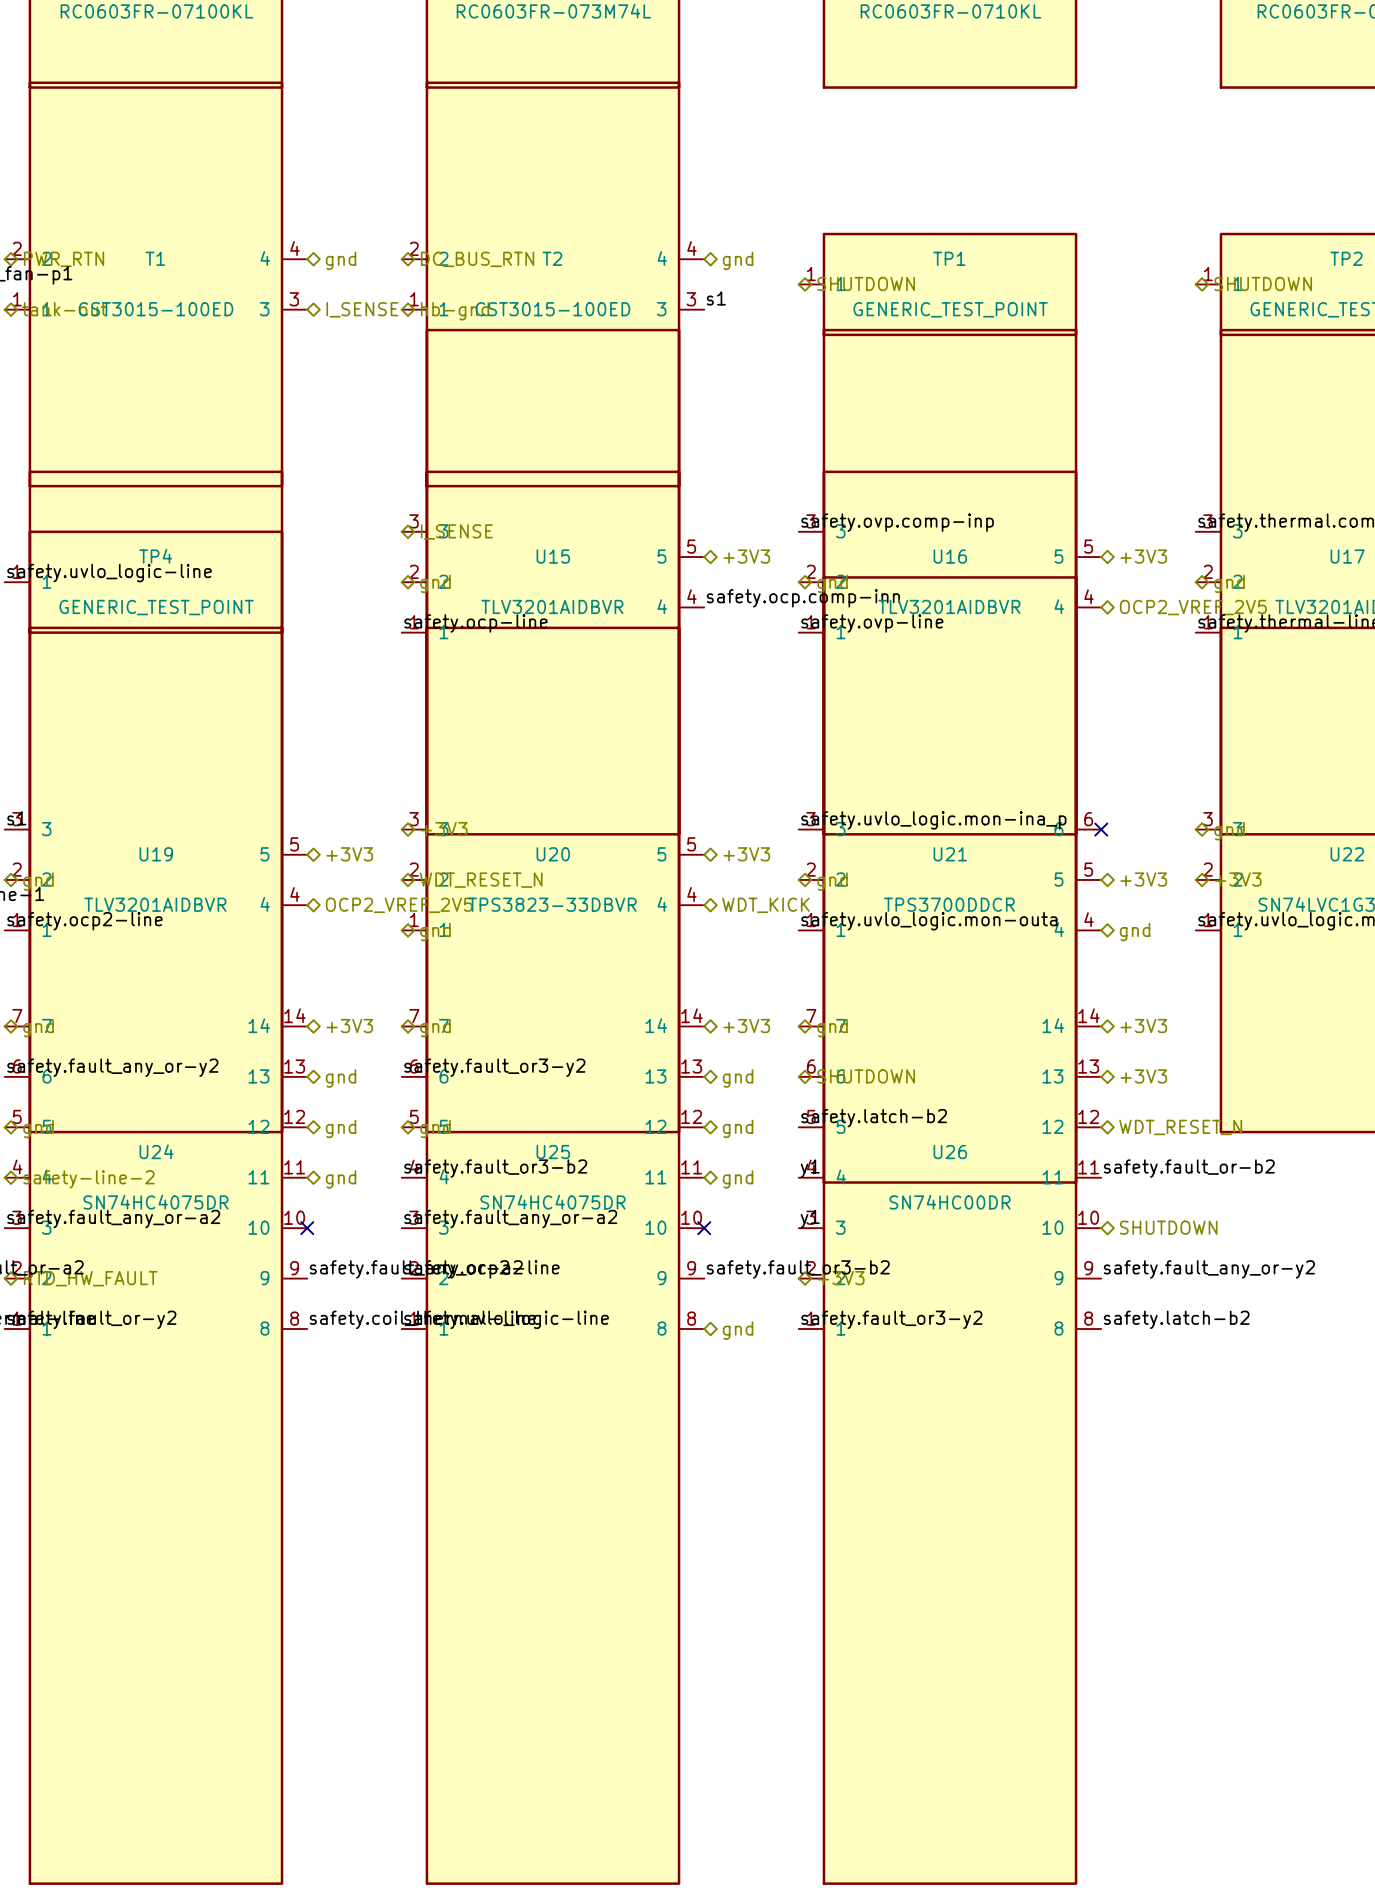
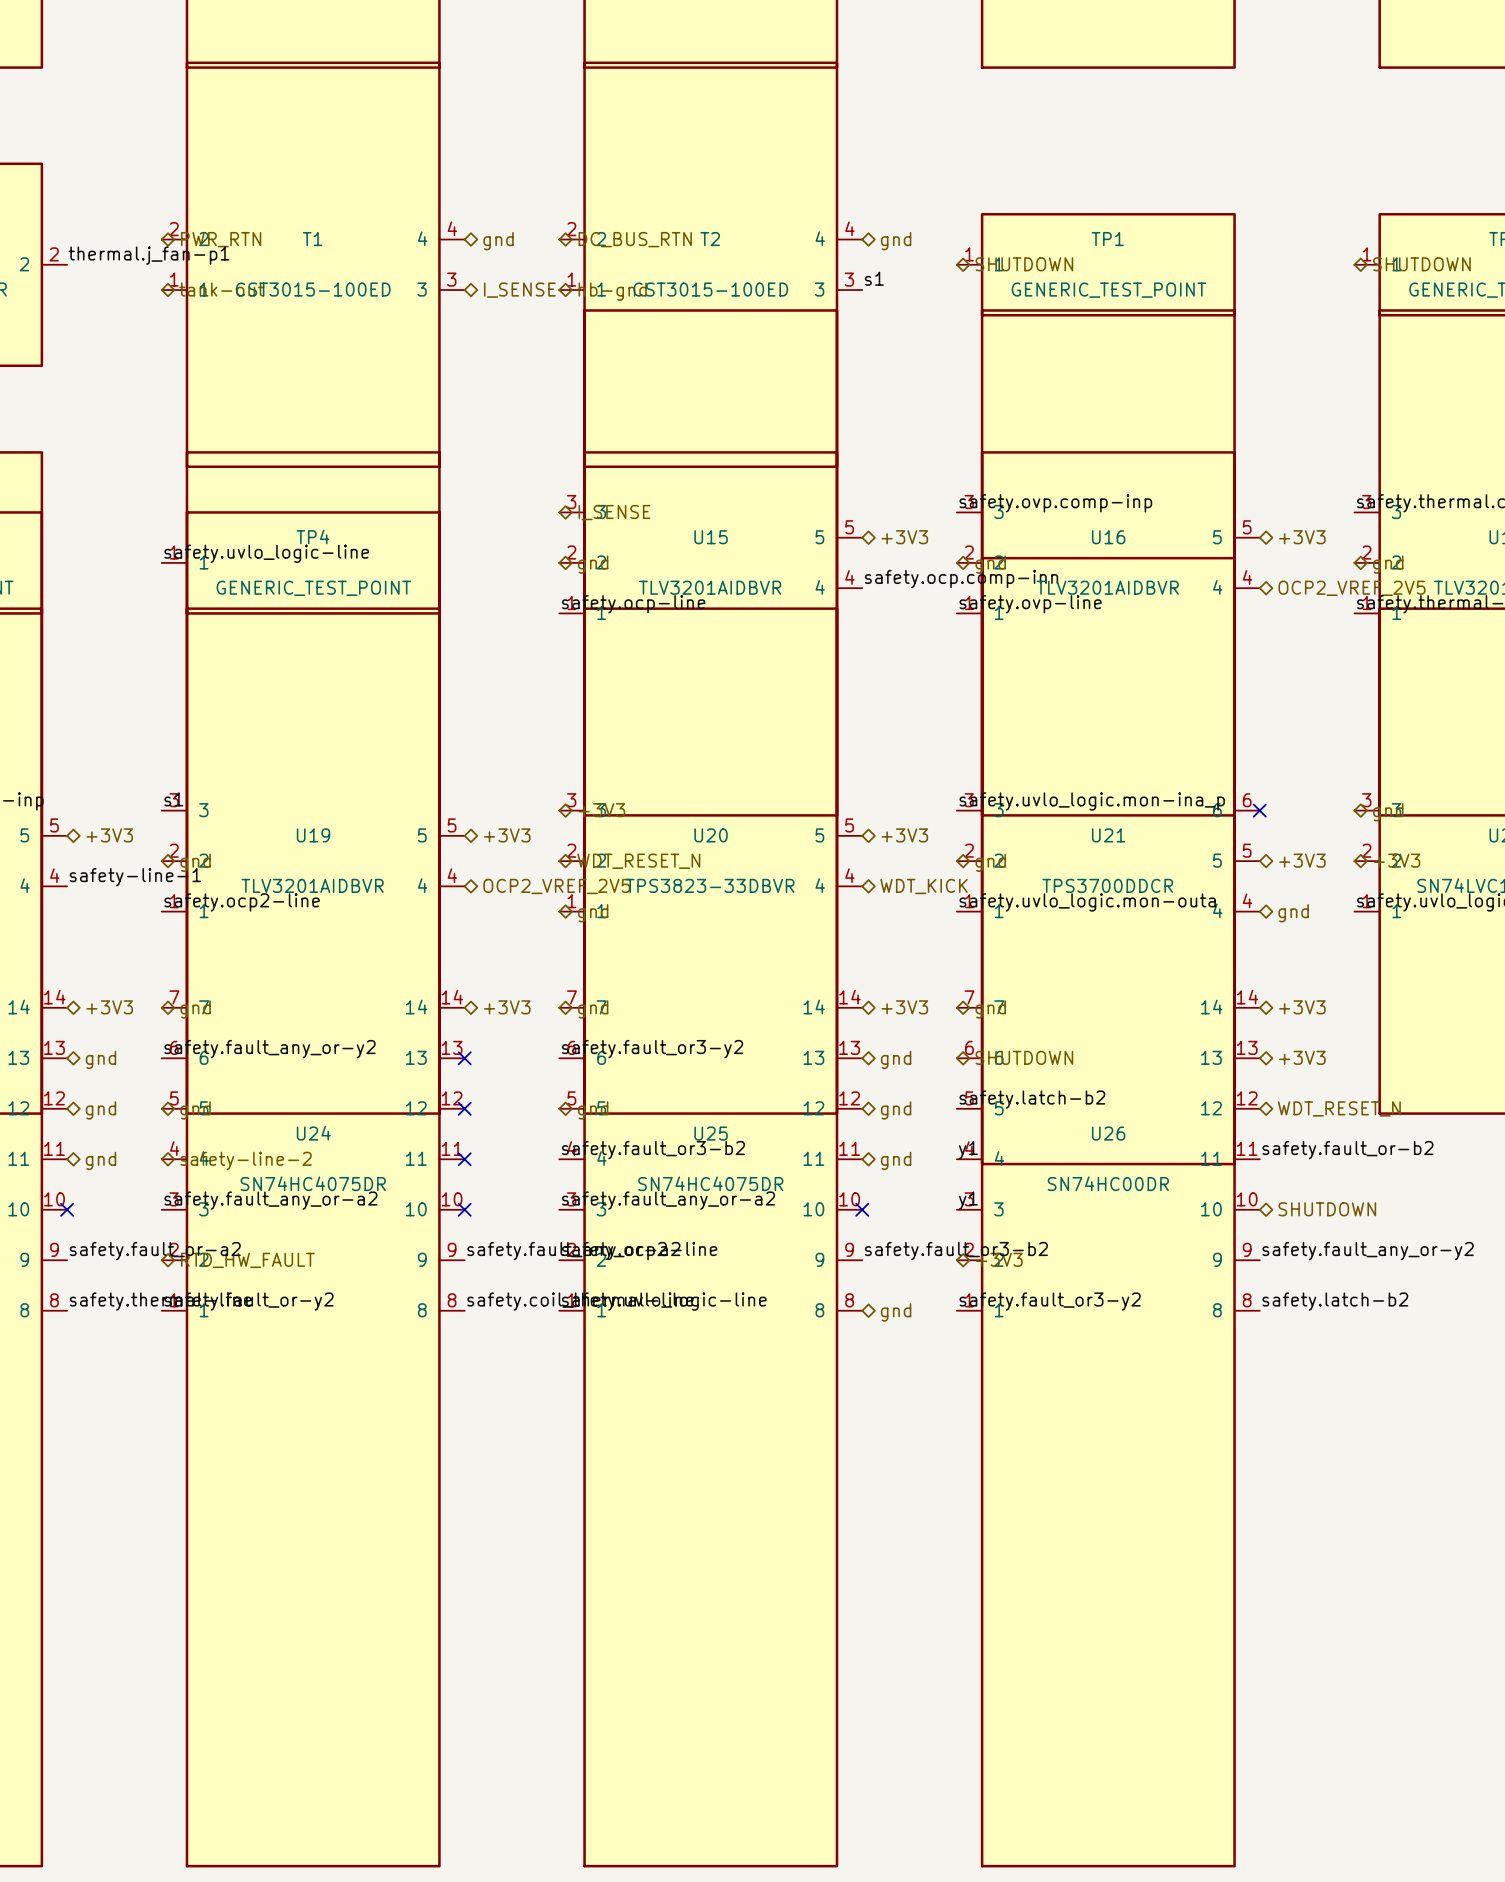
no-connect mark: none -> (464, 1058)
hierarchical label: gnd (341, 1078) -> none
no-connect mark: none -> (464, 1108)
hierarchical label: gnd (341, 1128) -> none
no-connect mark: none -> (464, 1159)
hierarchical label: gnd (341, 1179) -> none

